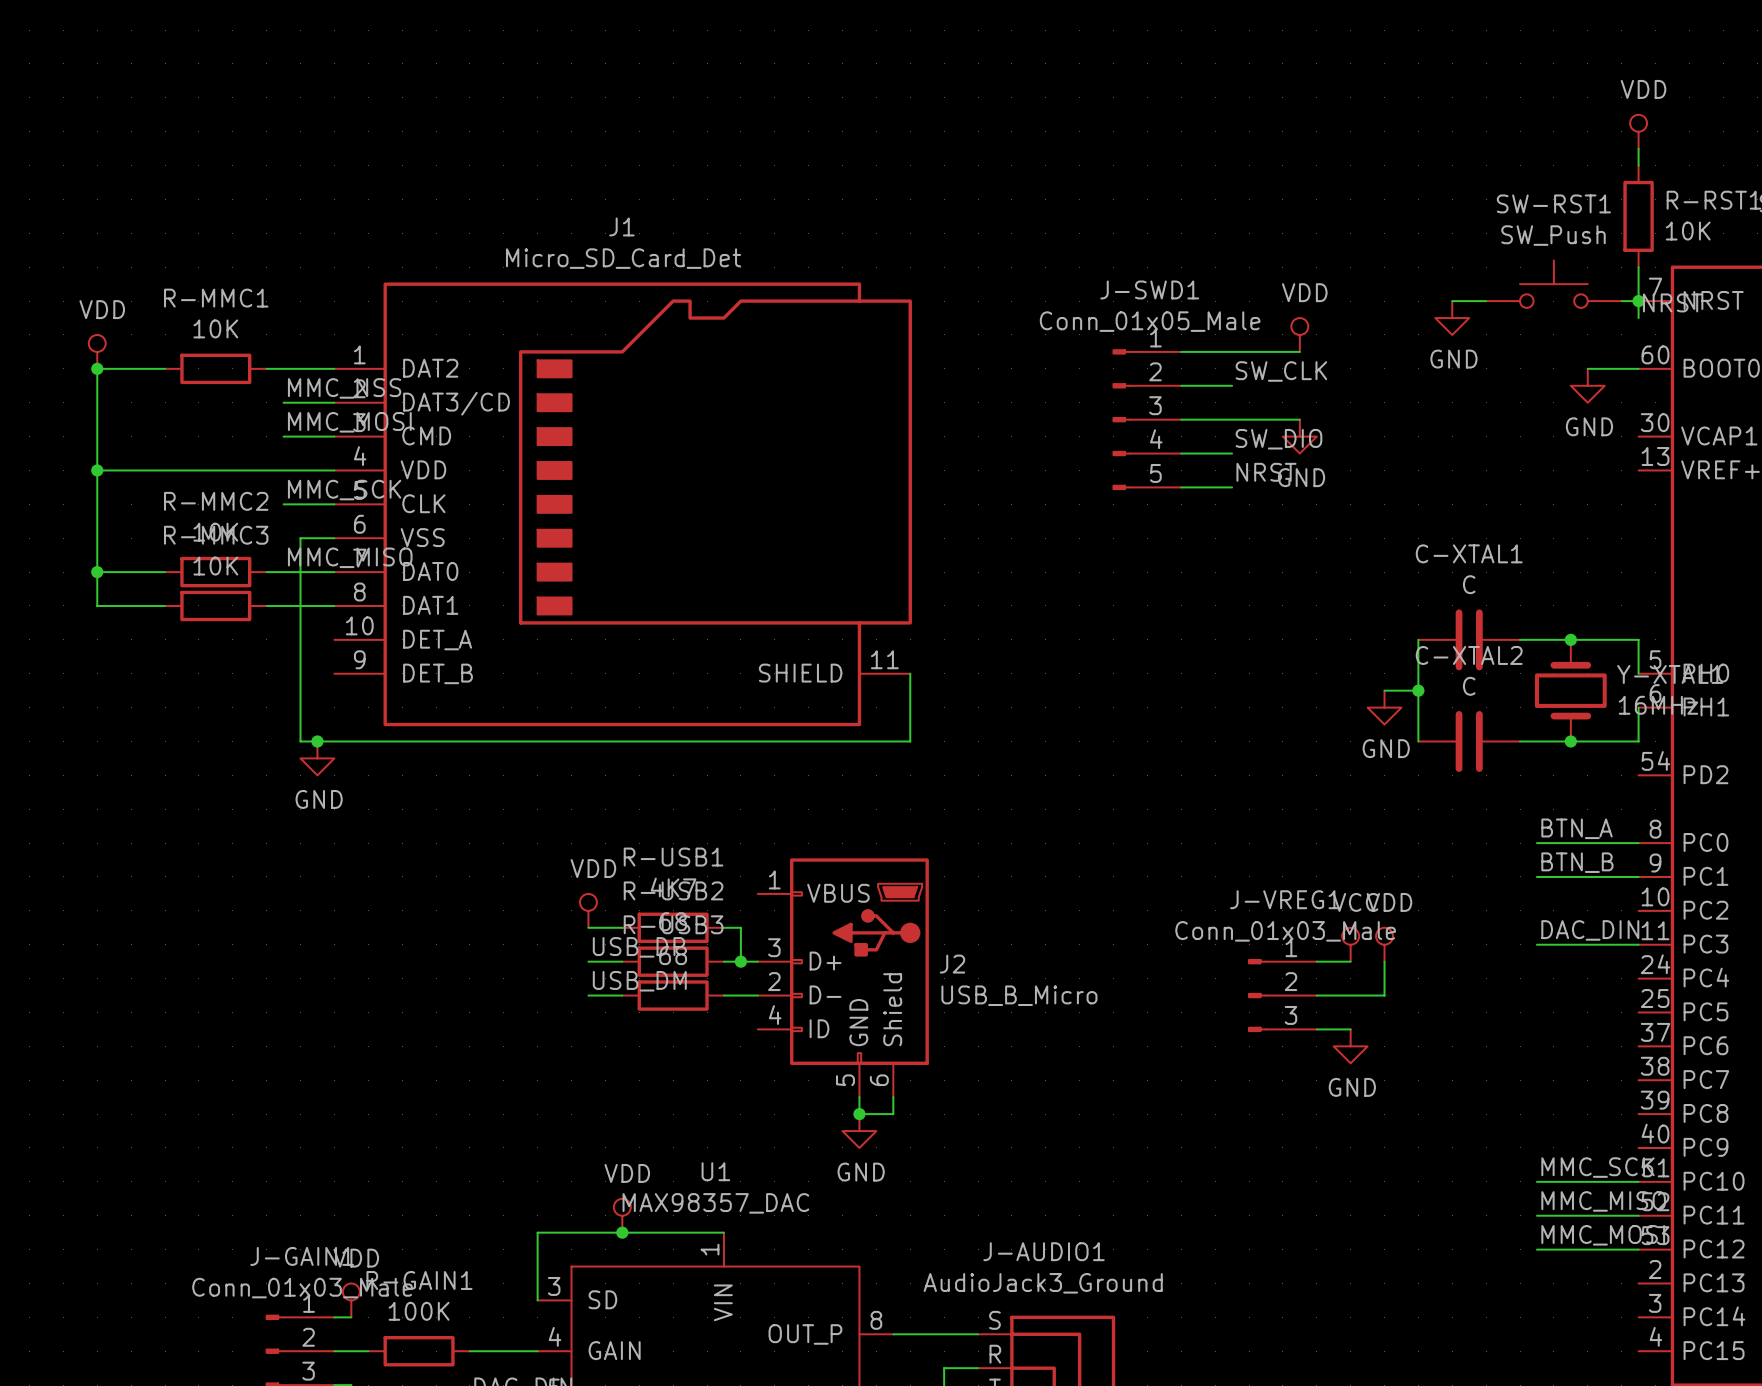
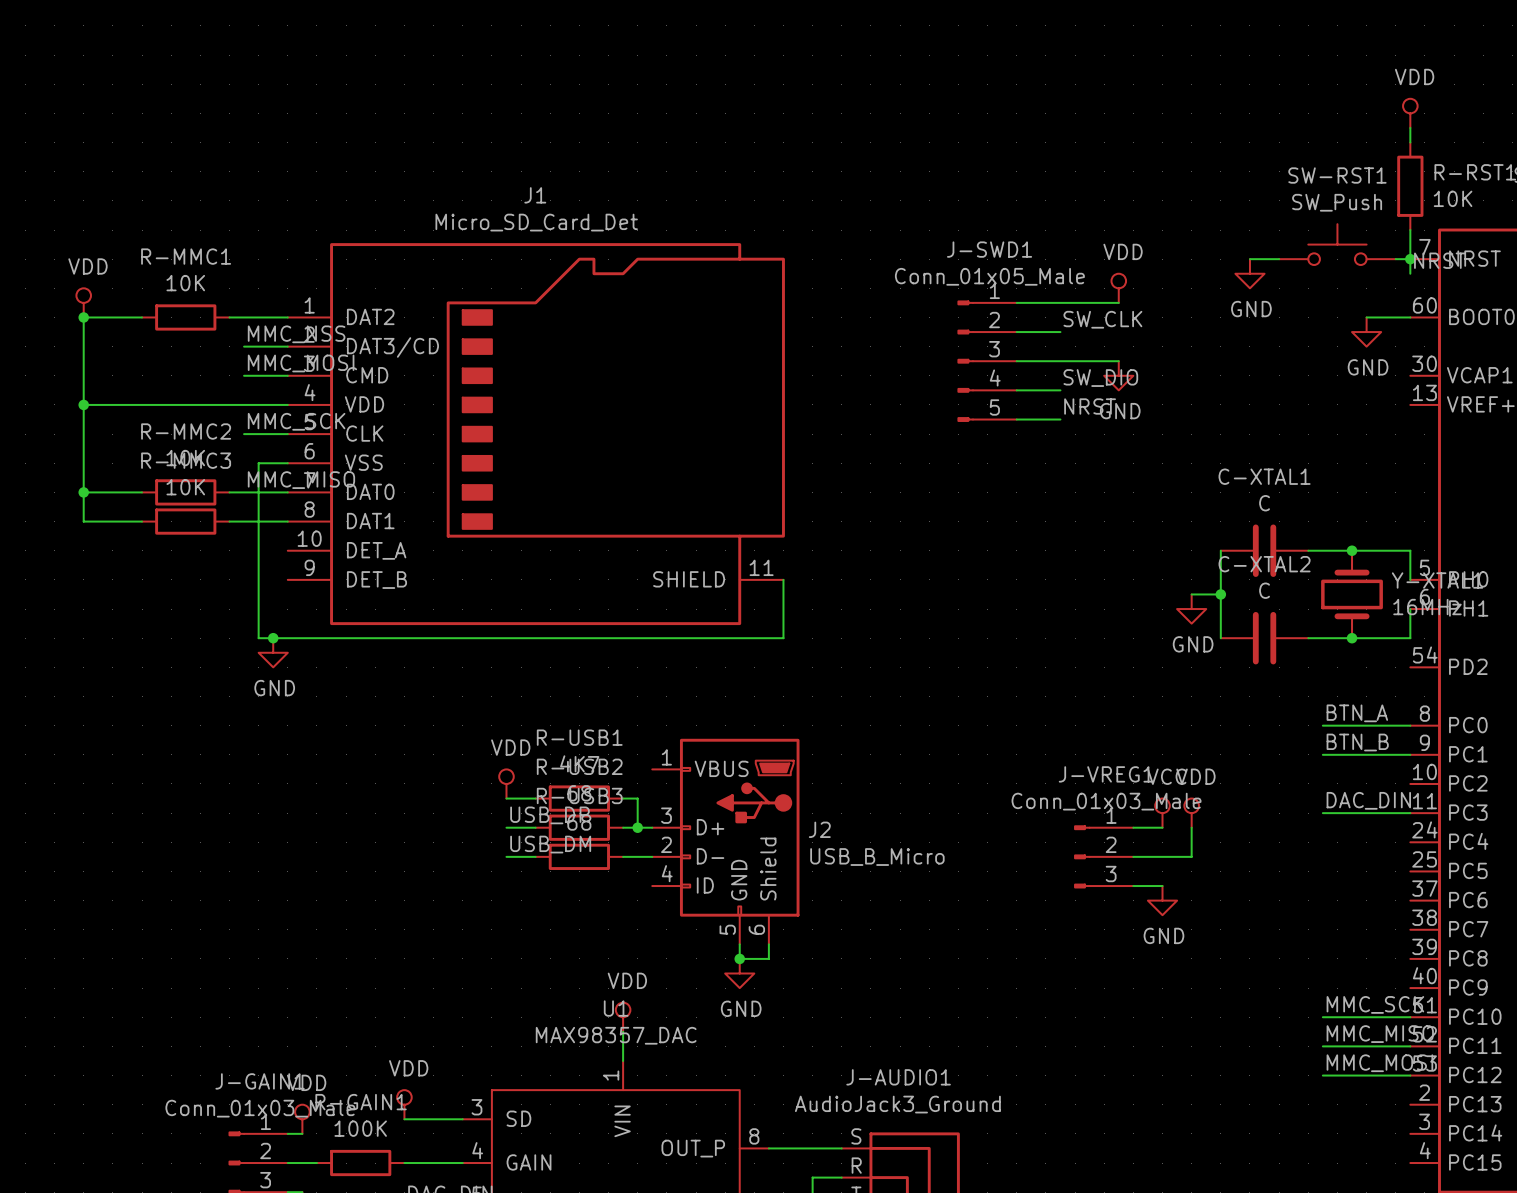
power symbol: none -> VDD (623, 1017)
power symbol: VDD (622, 1215) -> none
junction: (622, 1232) -> none
wire: (723, 1232) (537, 1232) (537, 1300) -> (623, 1060) (623, 1031)
power symbol: none -> VDD (404, 1104)
wire: none -> (404, 1119) (462, 1119)

